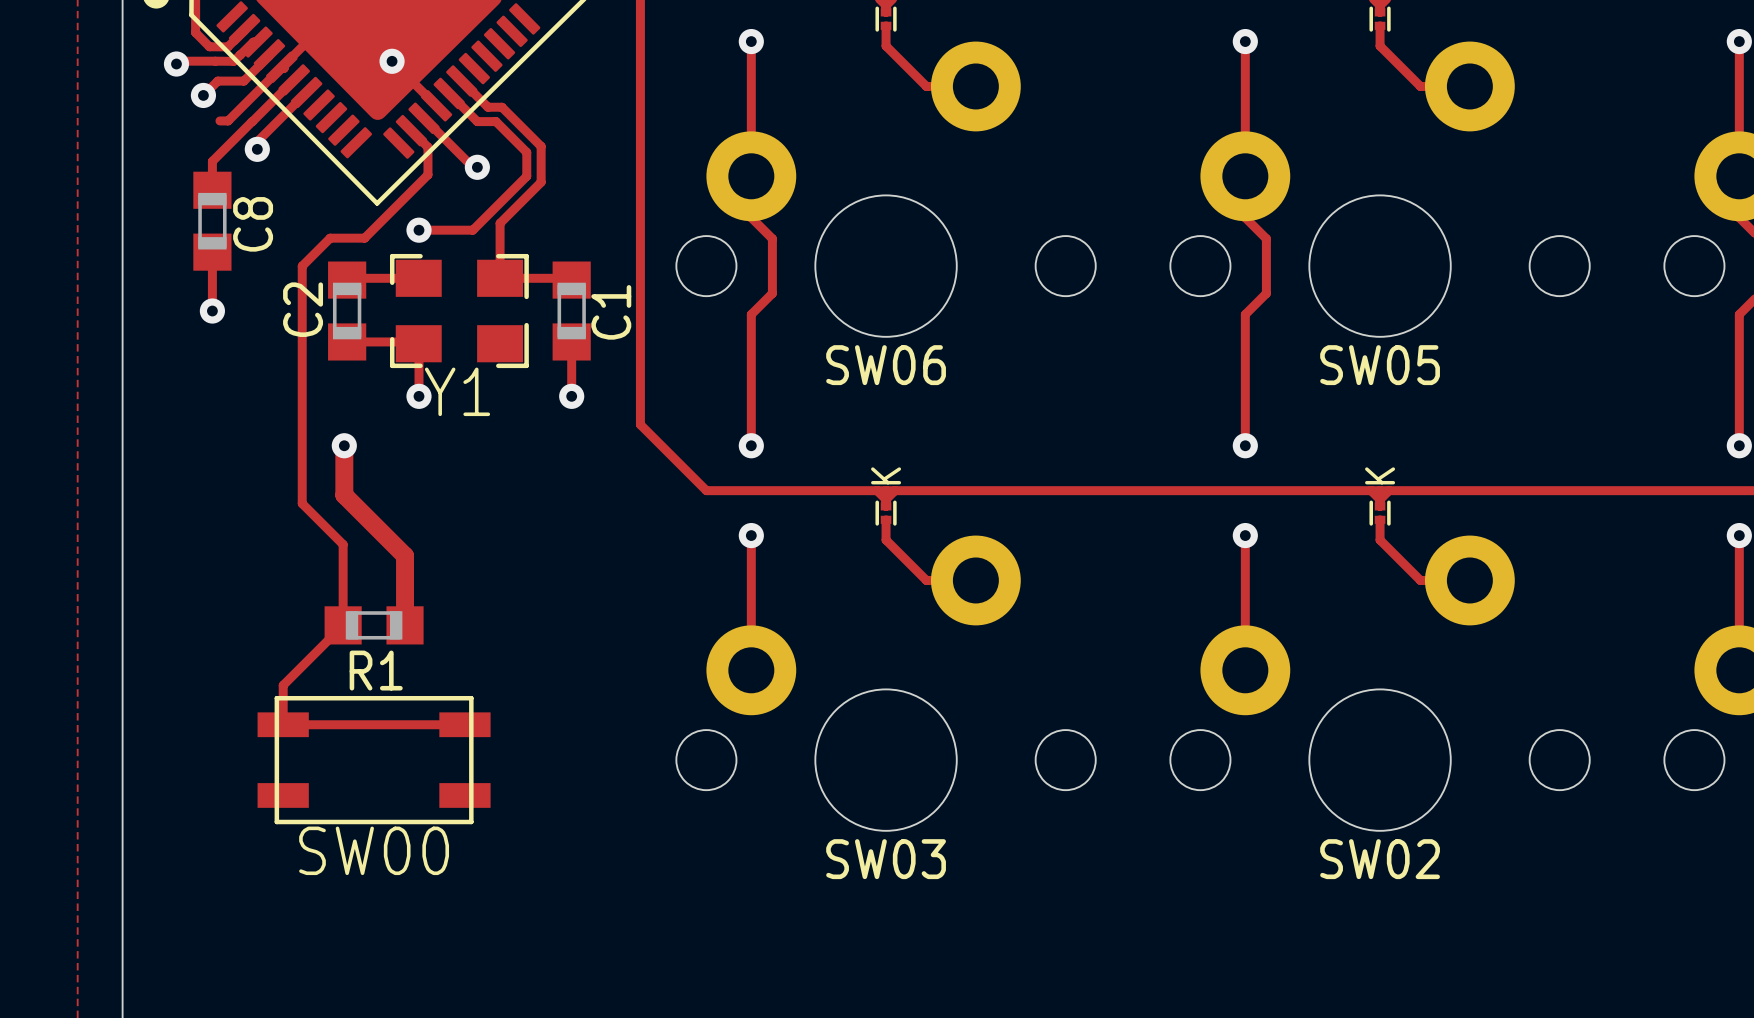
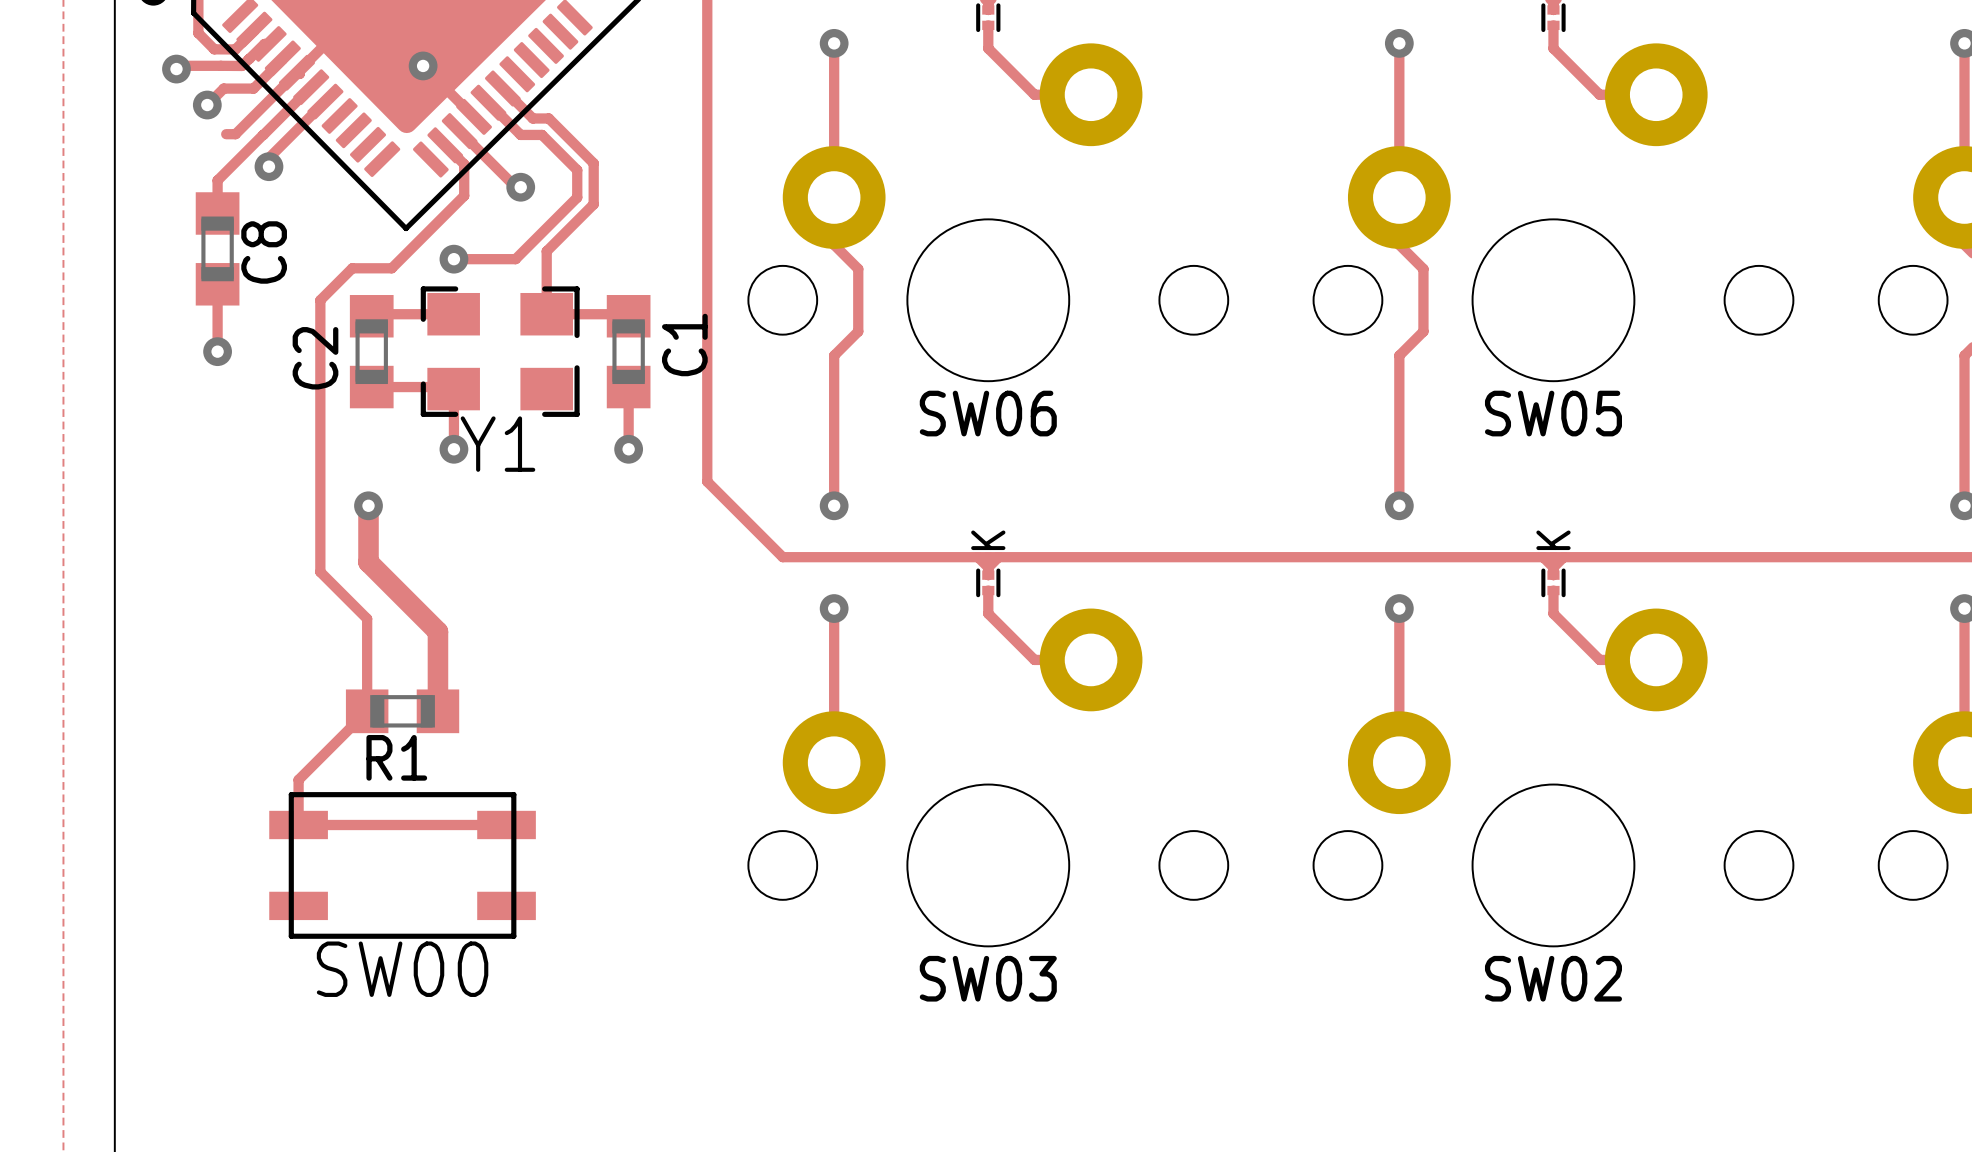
C2 name position: C2 (303, 309) -> C2 (315, 358)
C1 name position: C1 (611, 312) -> C1 (684, 345)
R1 name position: R1 (376, 670) -> R1 (396, 757)

